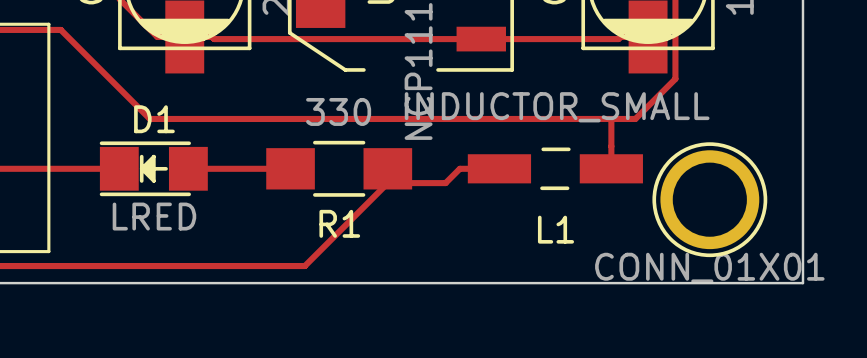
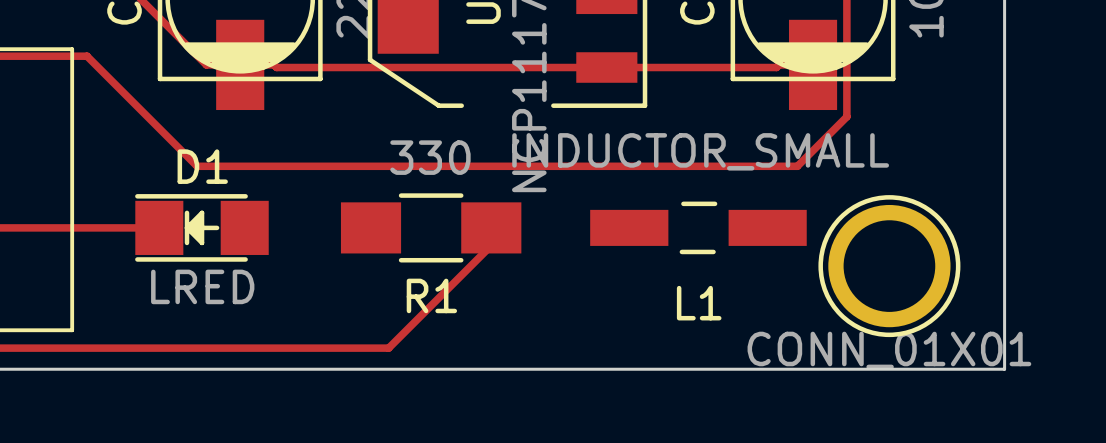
track: (611, 118) (611, 168) -> none
track: (188, 168) (290, 168) -> none
track: (387, 168) (387, 183) (445, 183) (459, 168) (499, 168) -> none

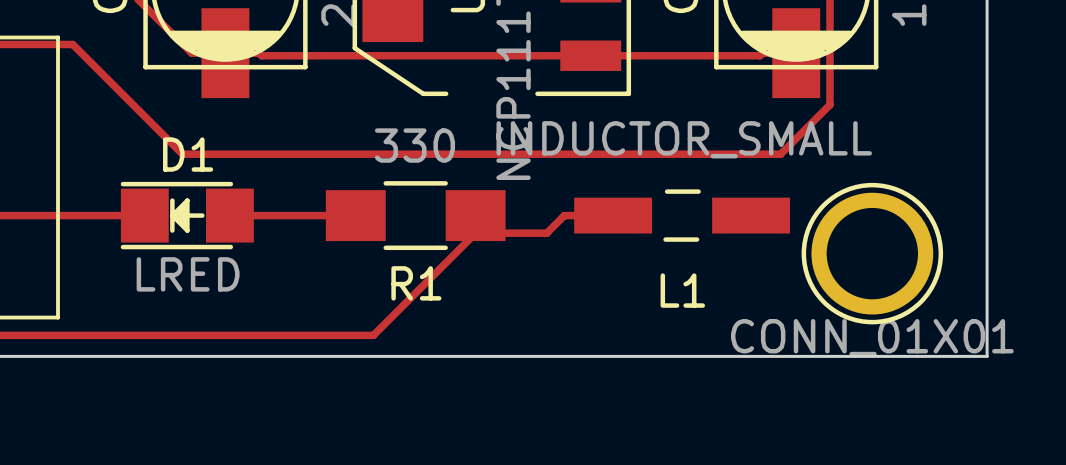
track: none -> (229, 215) (355, 215)
track: none -> (475, 215) (475, 233) (546, 233) (564, 215) (613, 215)

